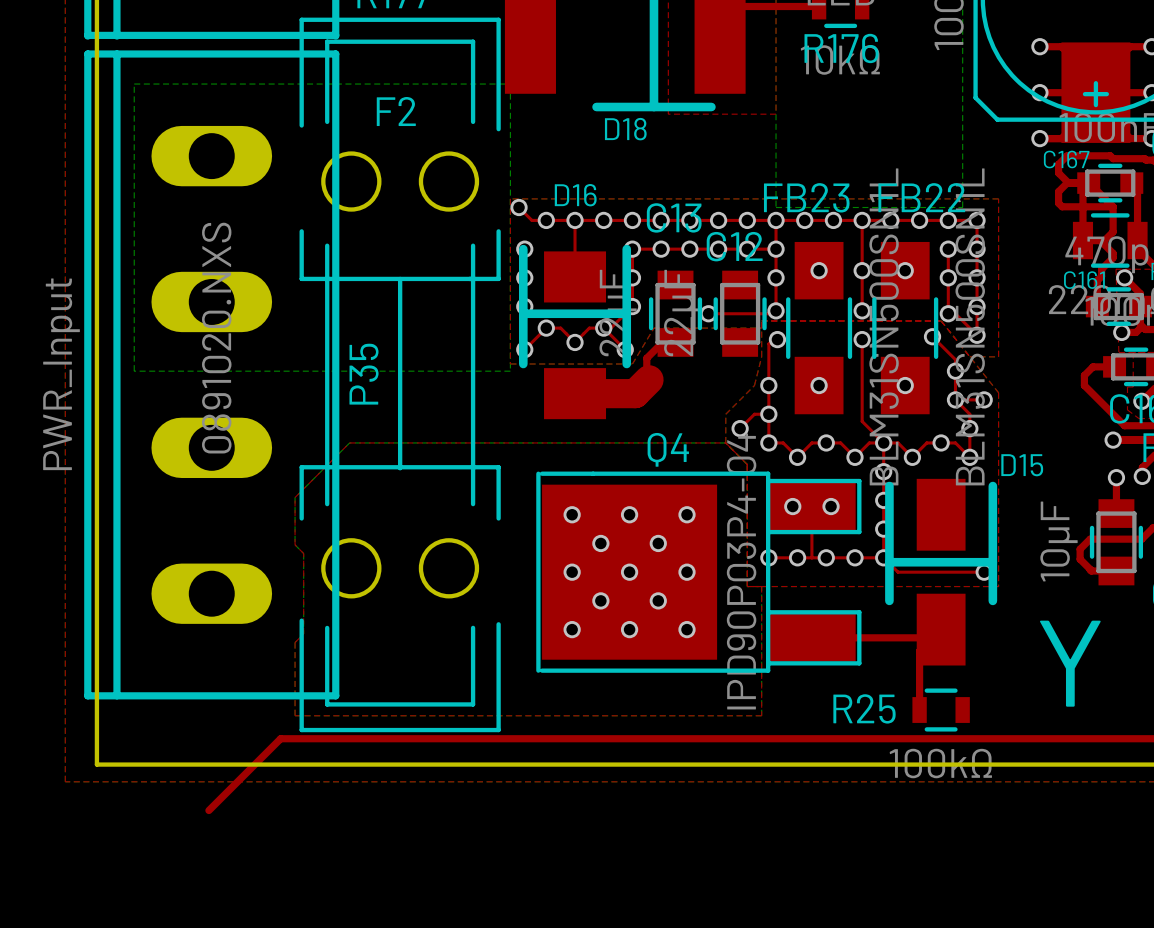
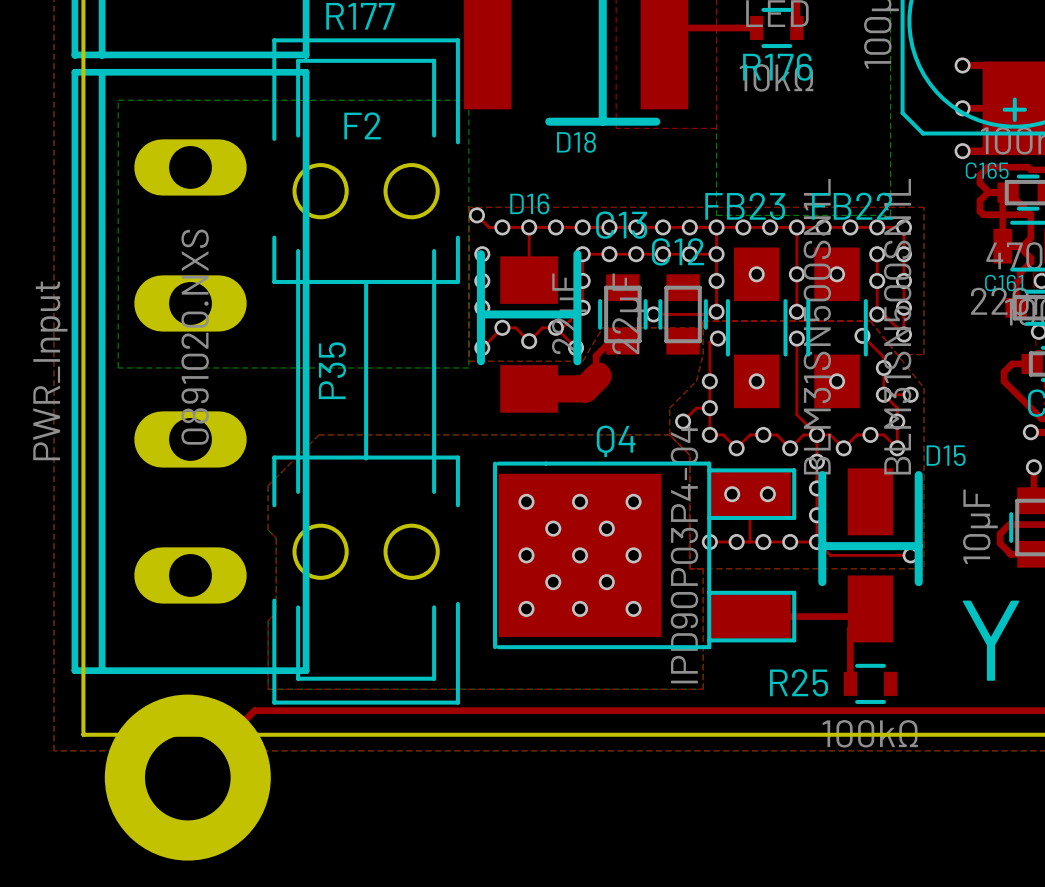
C167 name: C167 (1066, 159) -> C165 (987, 170)
part: none -> (187, 777)

